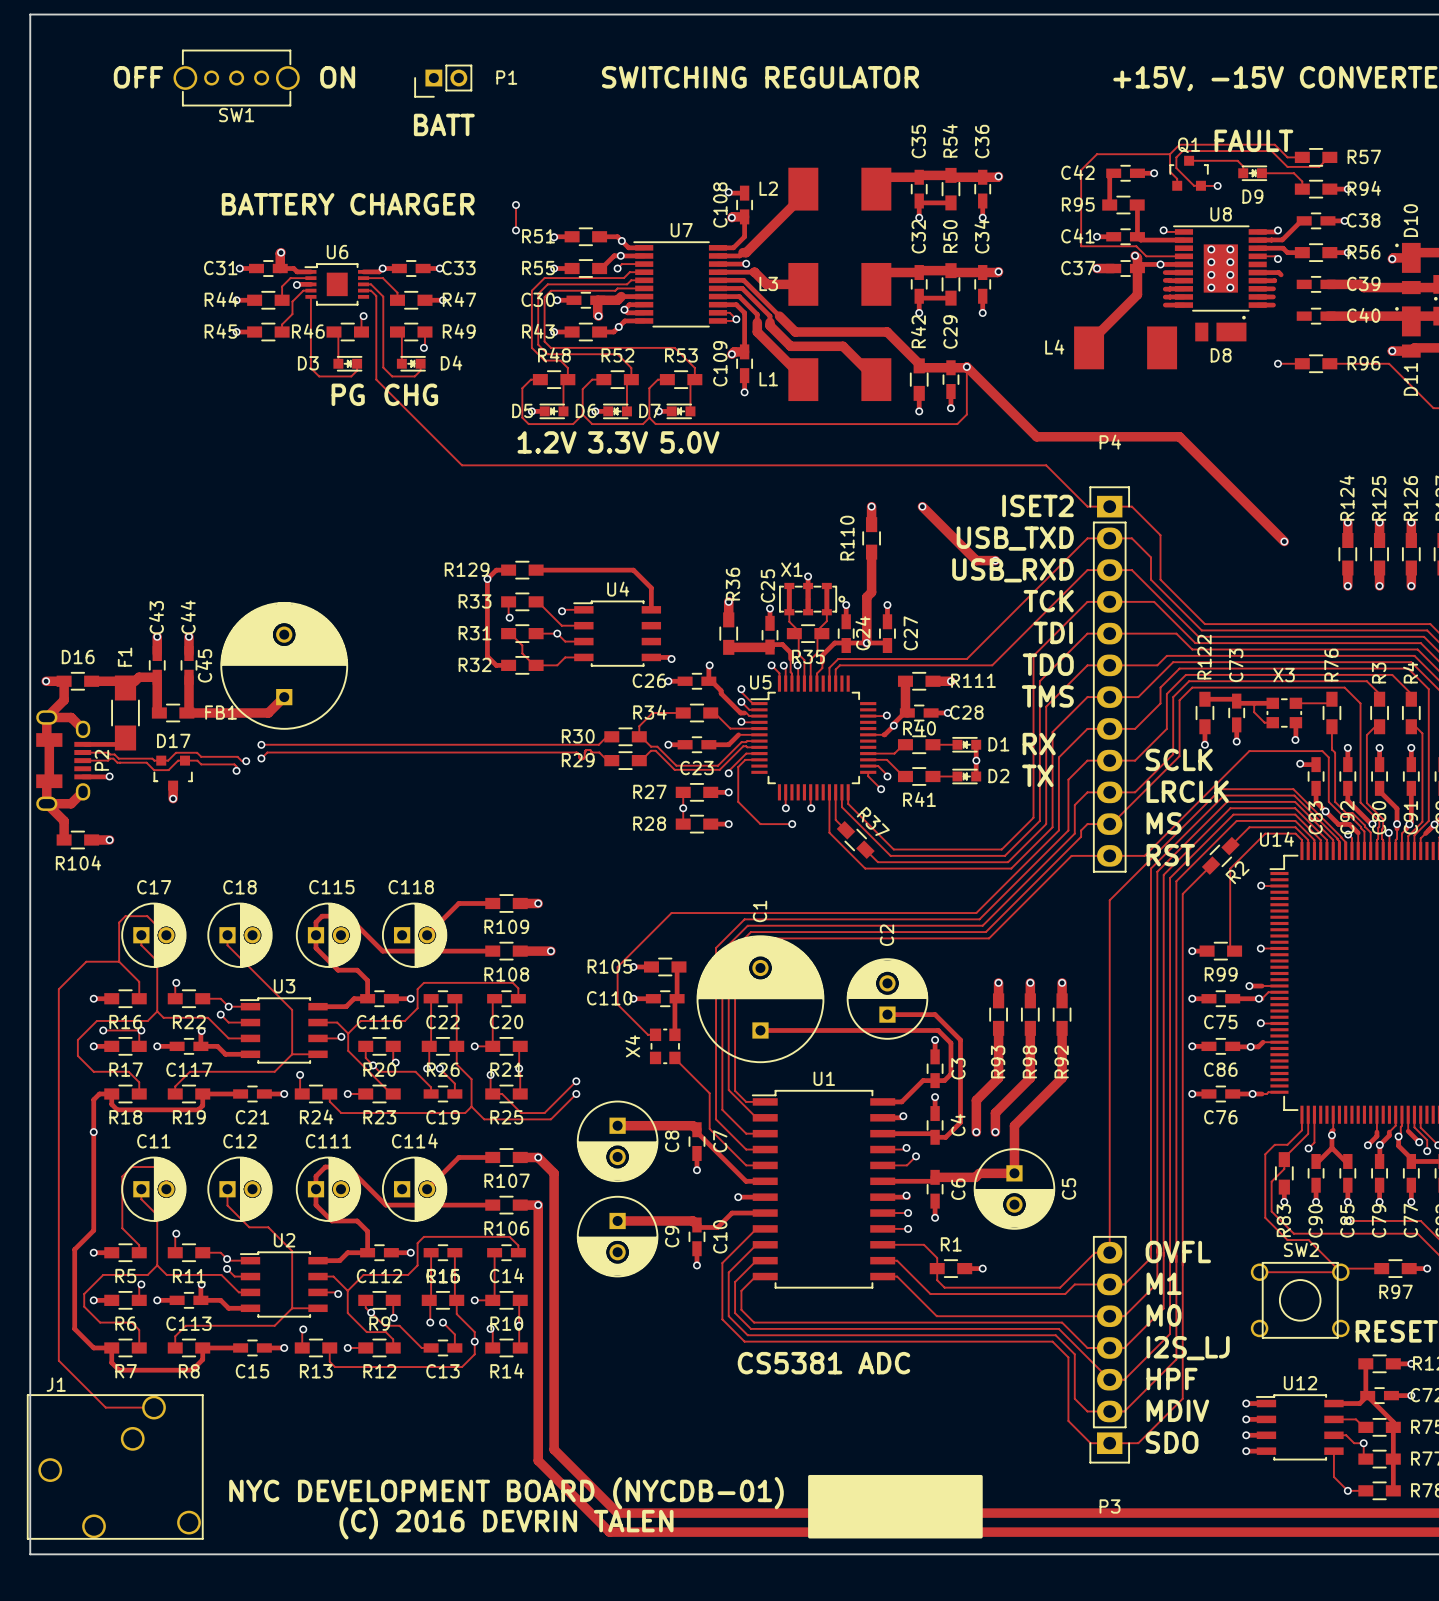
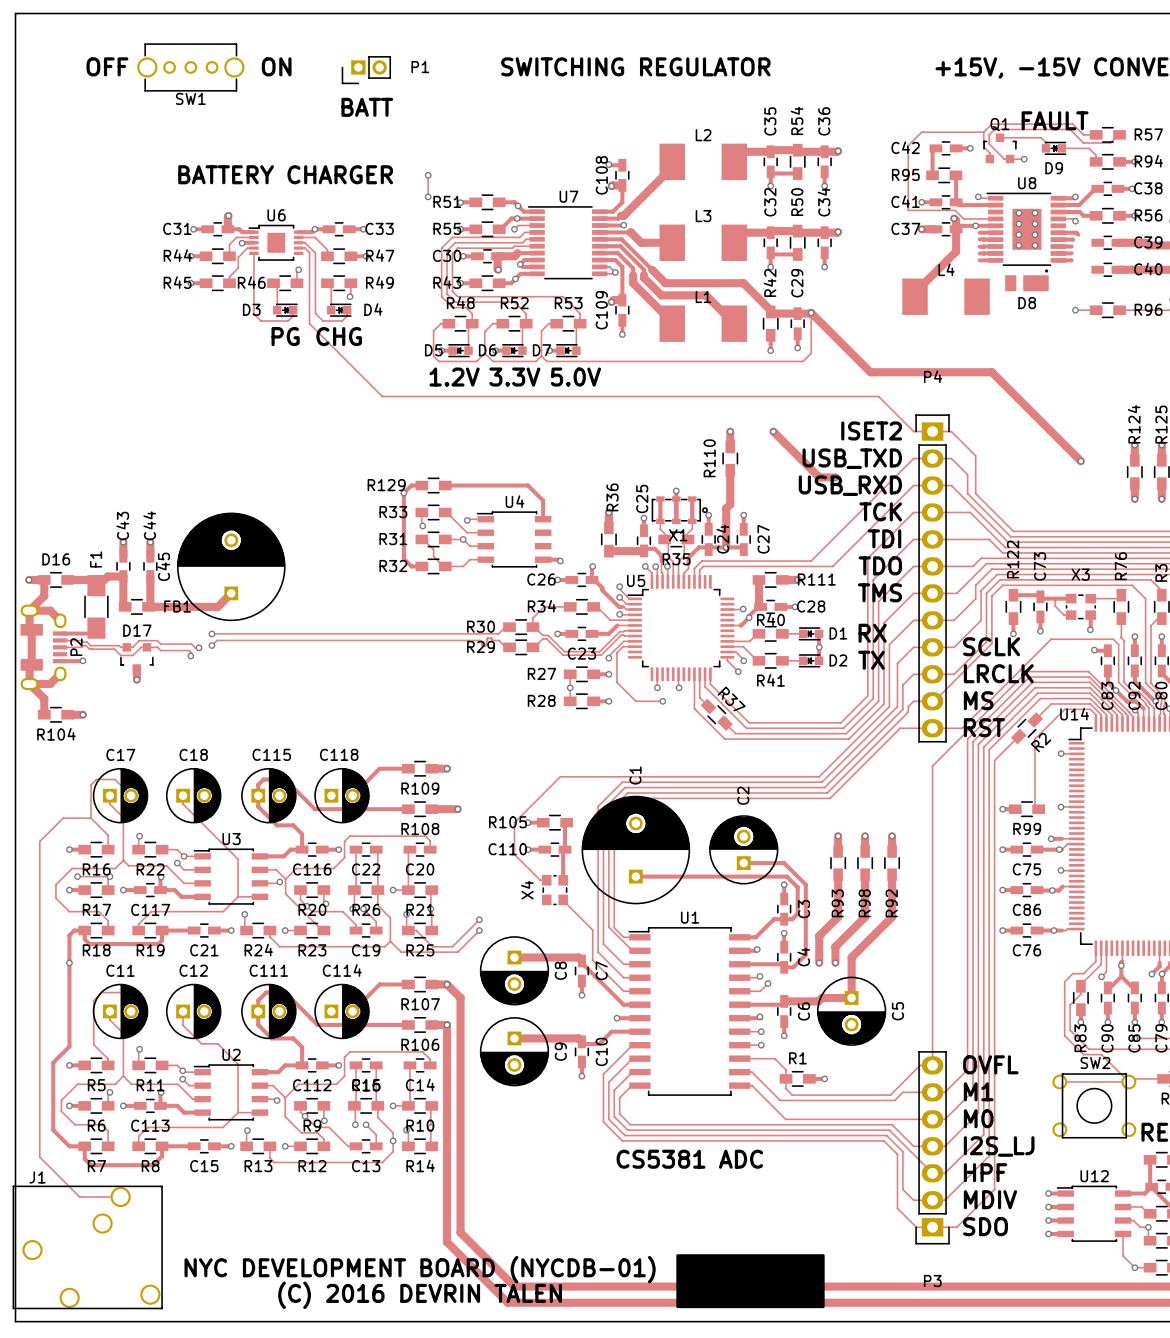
L2 name position: L2 (768, 188) -> L2 (703, 135)
L3 name position: L3 (768, 283) -> L3 (703, 216)
L4 name position: L4 (1054, 347) -> L4 (946, 269)
L1 name position: L1 (768, 379) -> L1 (703, 296)
X1 name position: X1 (791, 569) -> X1 (678, 535)

